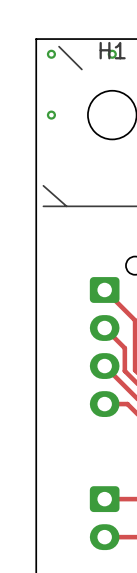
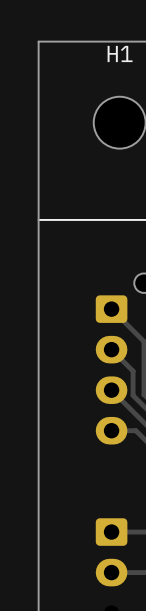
line: (59, 46) (81, 69) -> none
via: (51, 54) -> none
via: (112, 54) -> none
via: (51, 115) -> none
line: (43, 185) (66, 206) -> none
line: none -> (38, 219) (46, 219)

